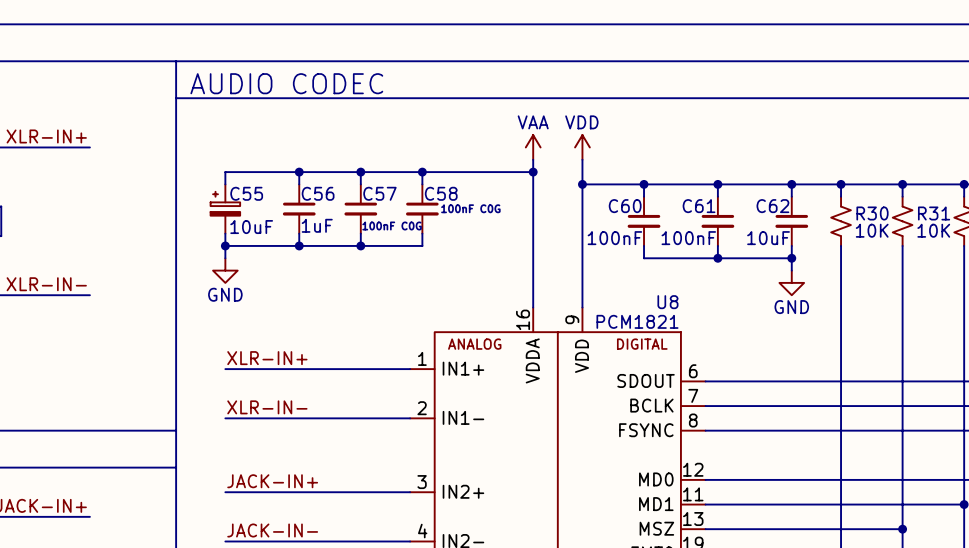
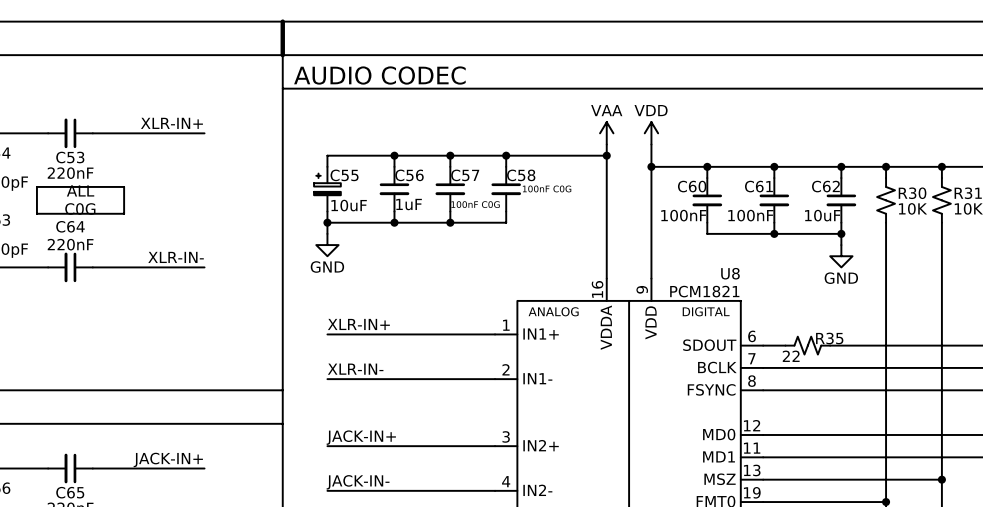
line: none -> (282, 21) (282, 55)
R35: none -> 22 (807, 345)

